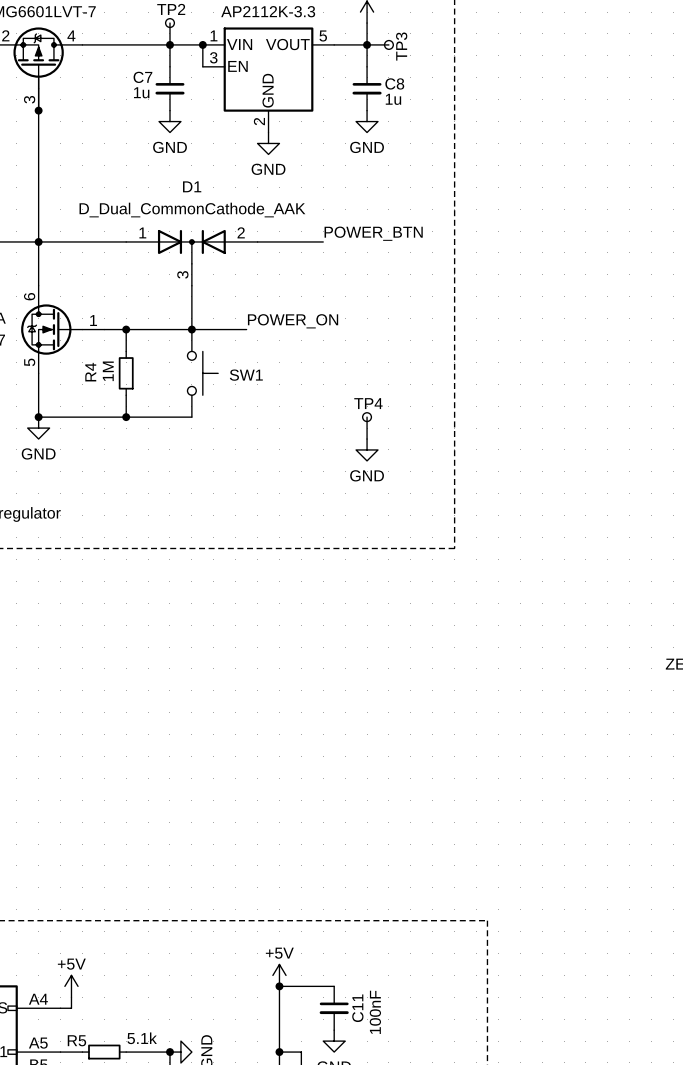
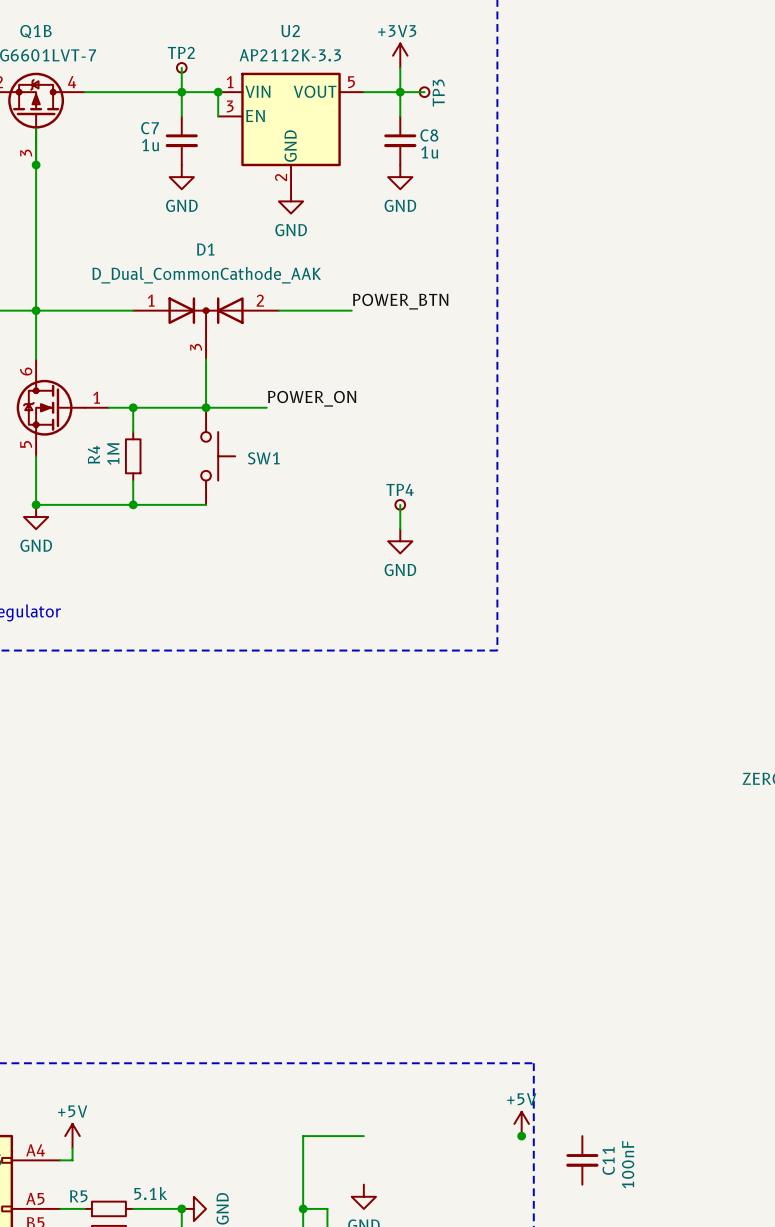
power symbol position: +5V (279, 975) -> +5V (521, 1123)
junction: (279, 986) -> none
junction: none -> (521, 1136)
C11 position: (334, 1008) -> (582, 1160)

